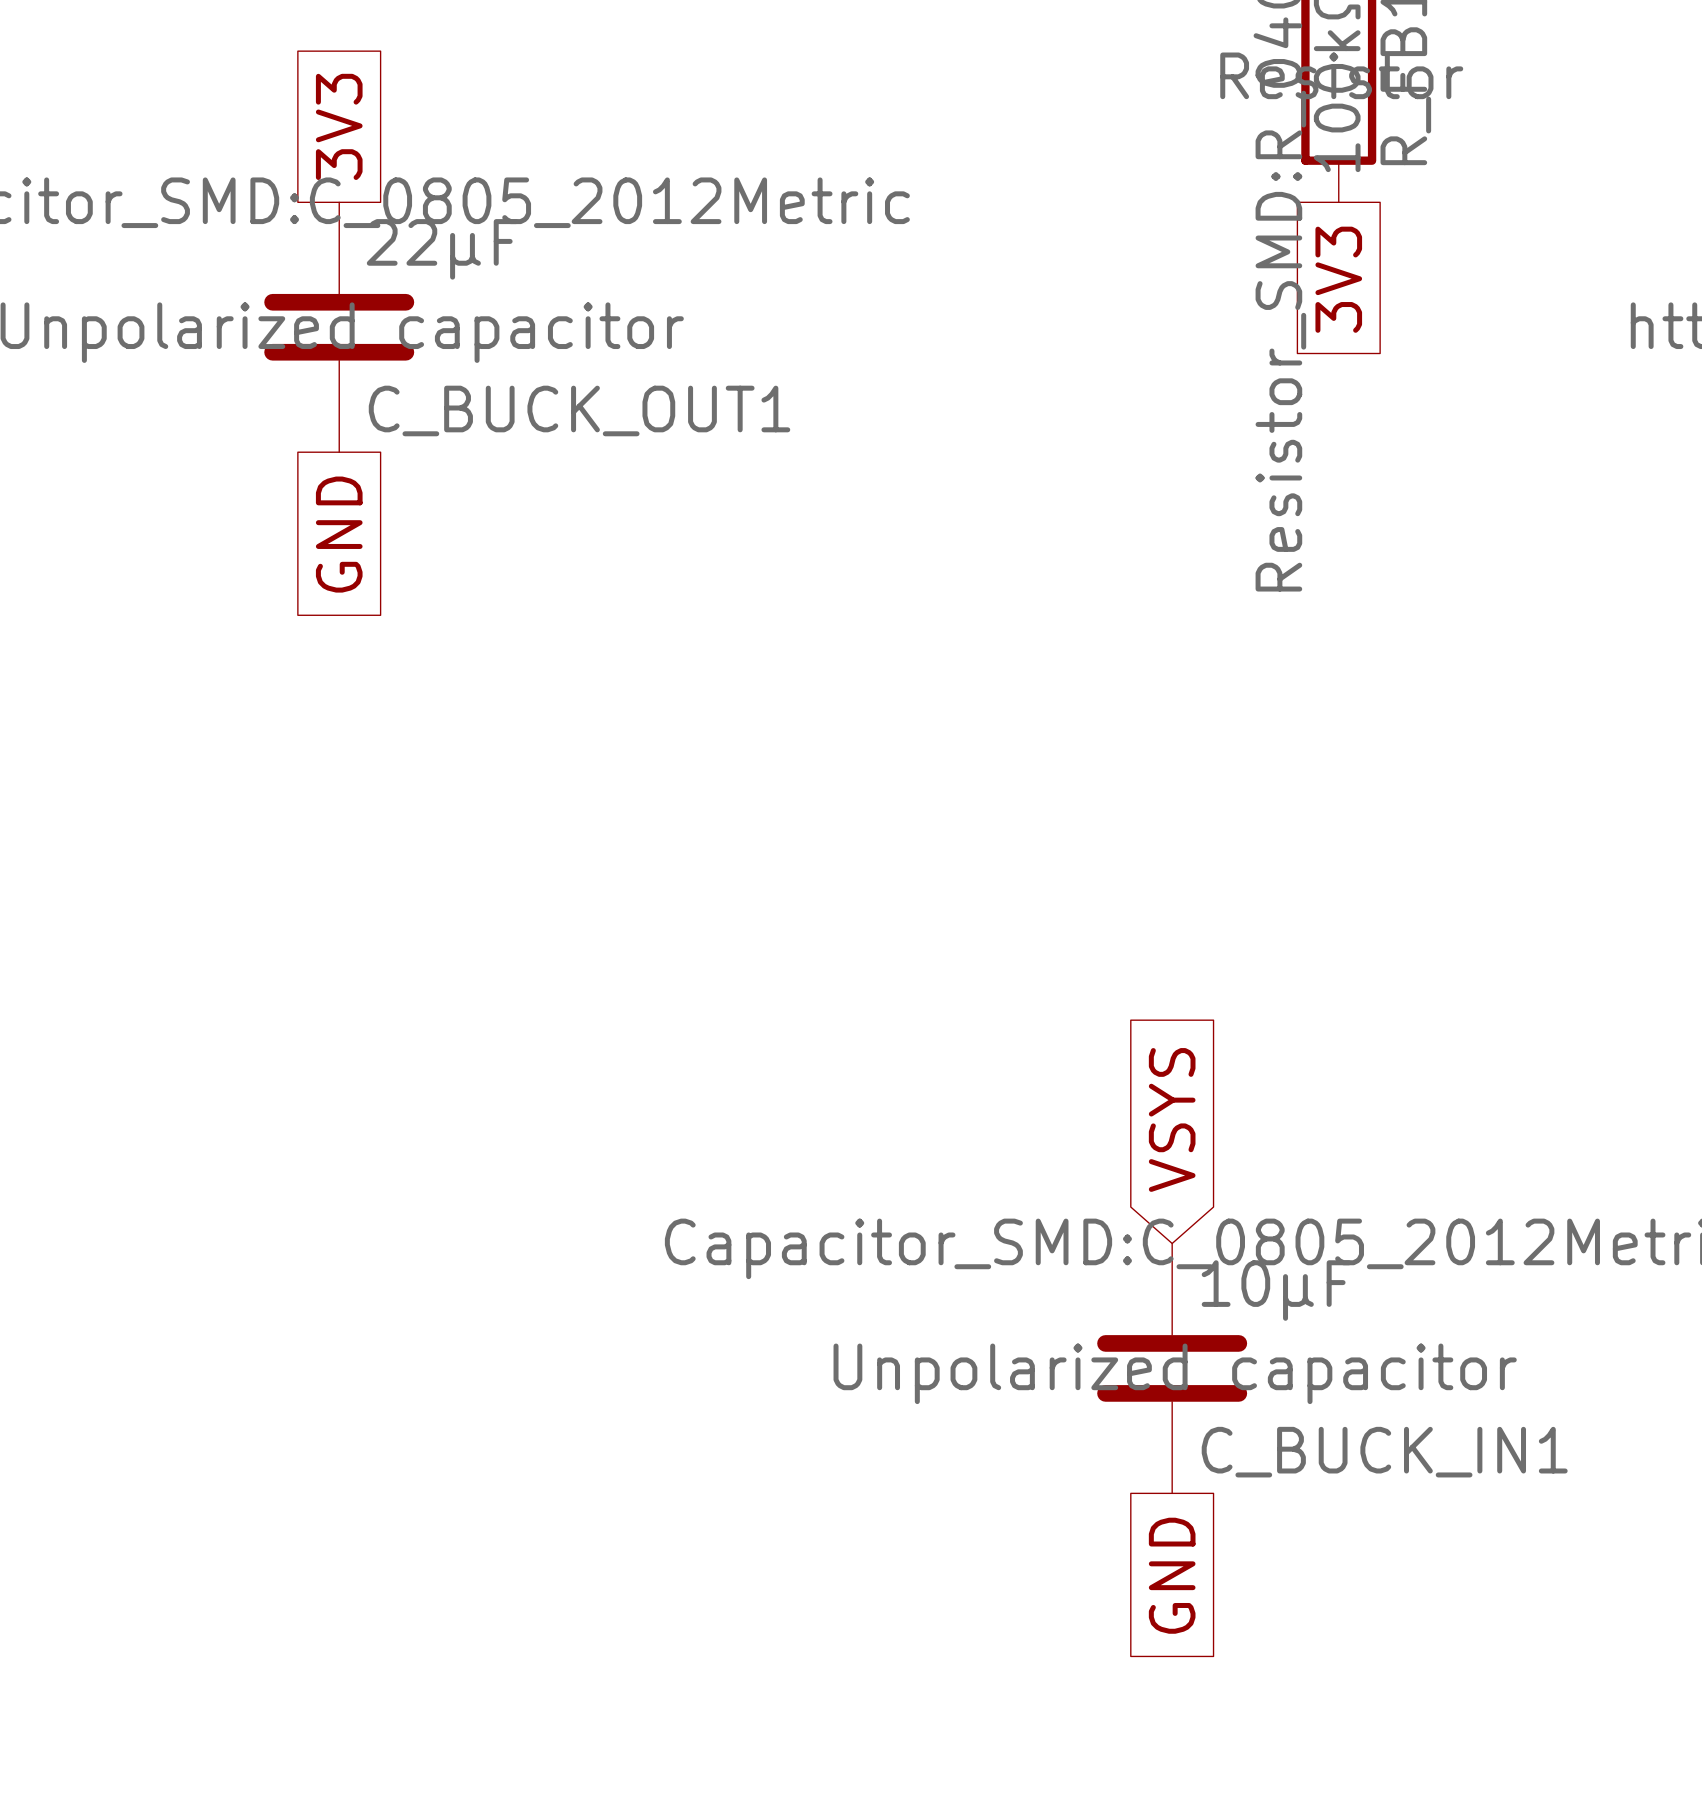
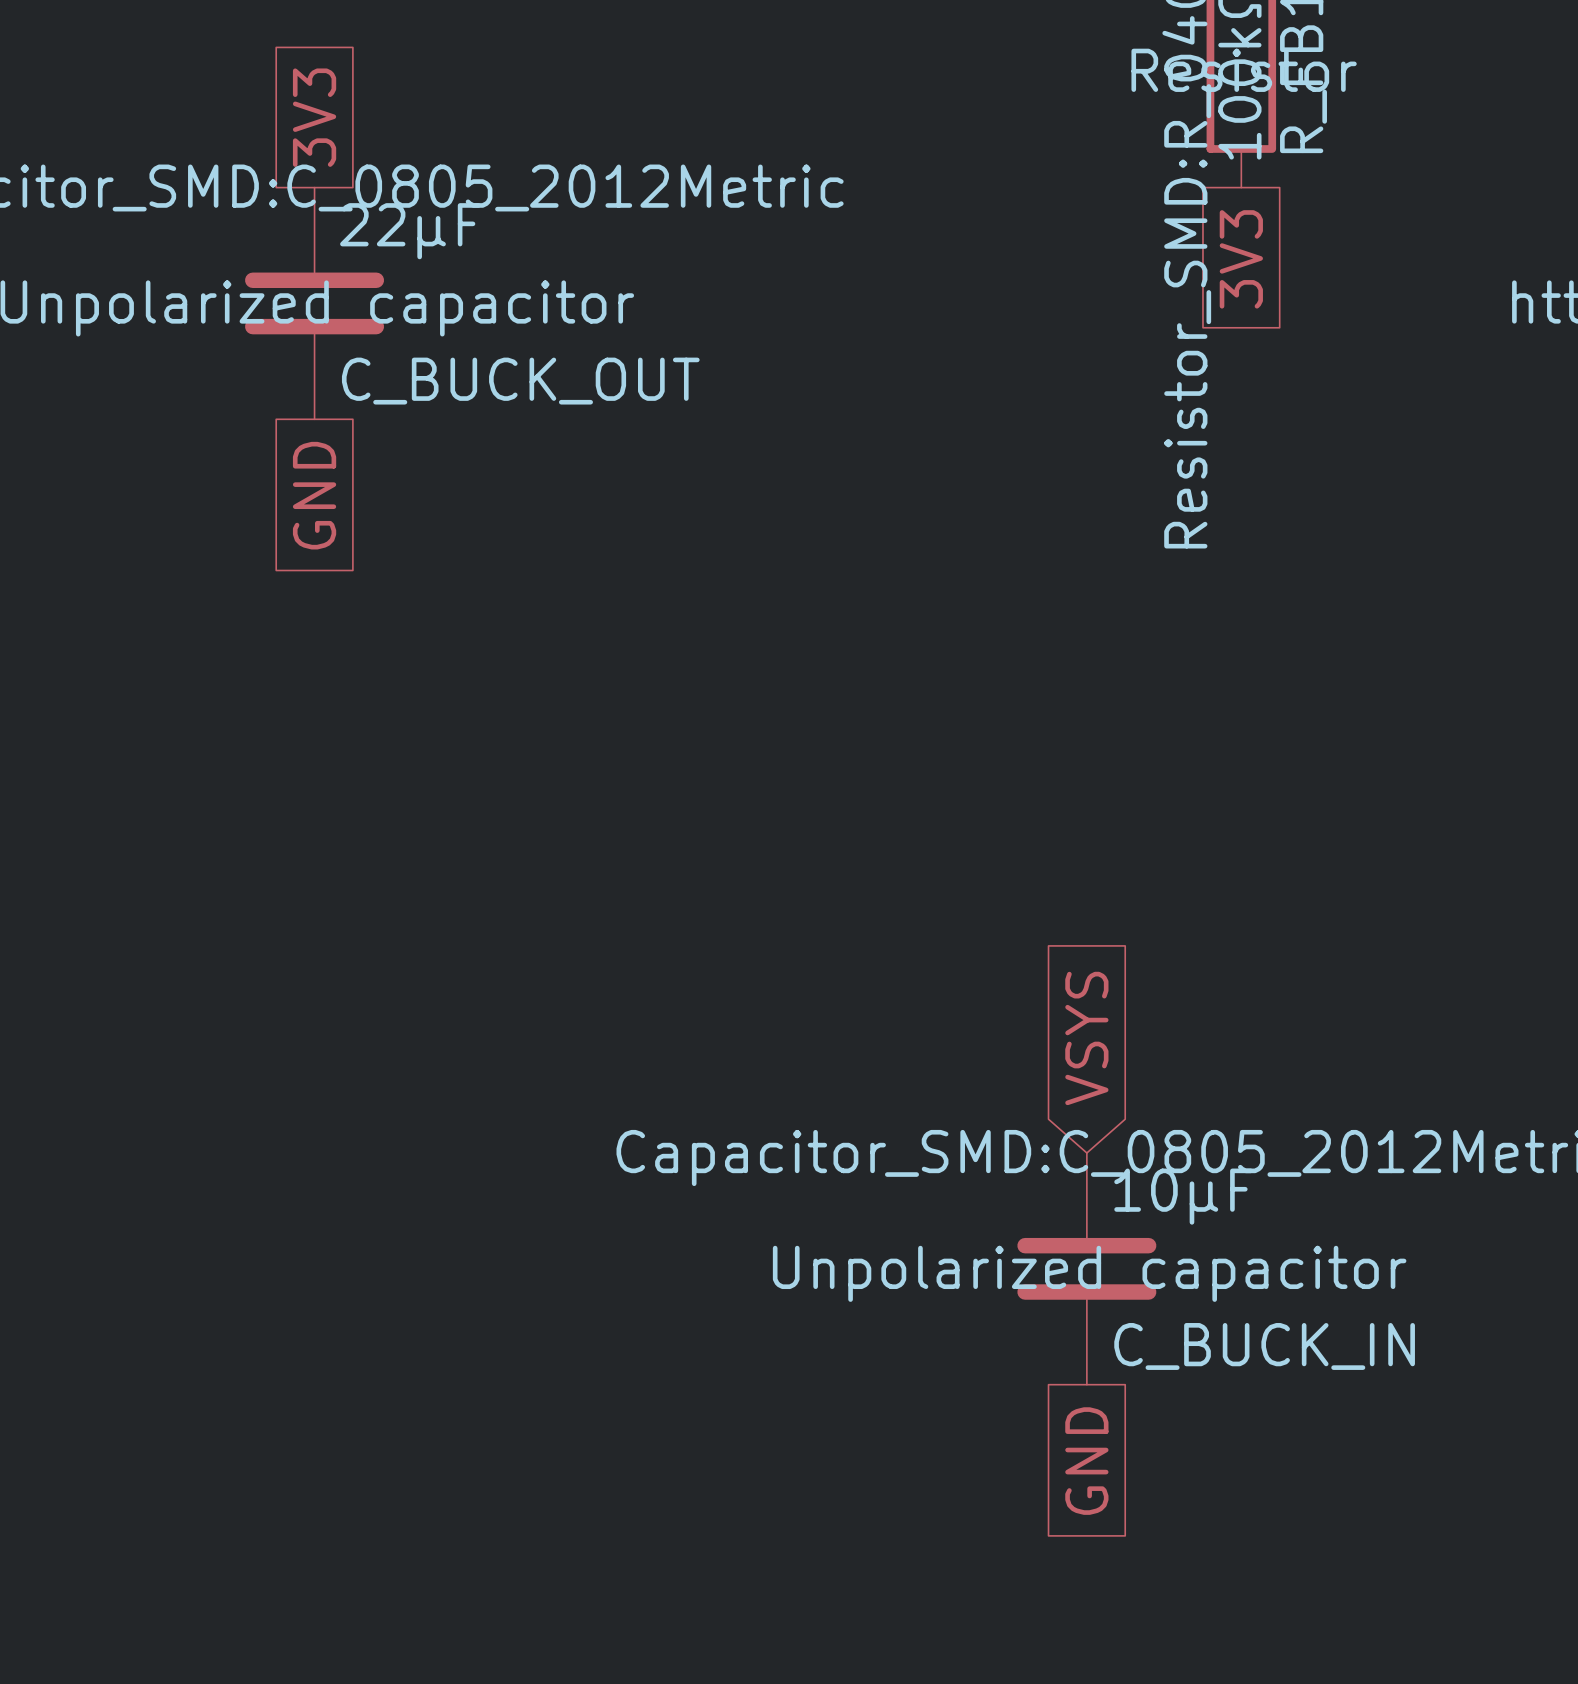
C_BUCK_OUT1 name: C_BUCK_OUT1 (579, 410) -> C_BUCK_OUT (520, 381)
C_BUCK_IN1 name: C_BUCK_IN1 (1384, 1452) -> C_BUCK_IN (1264, 1346)

